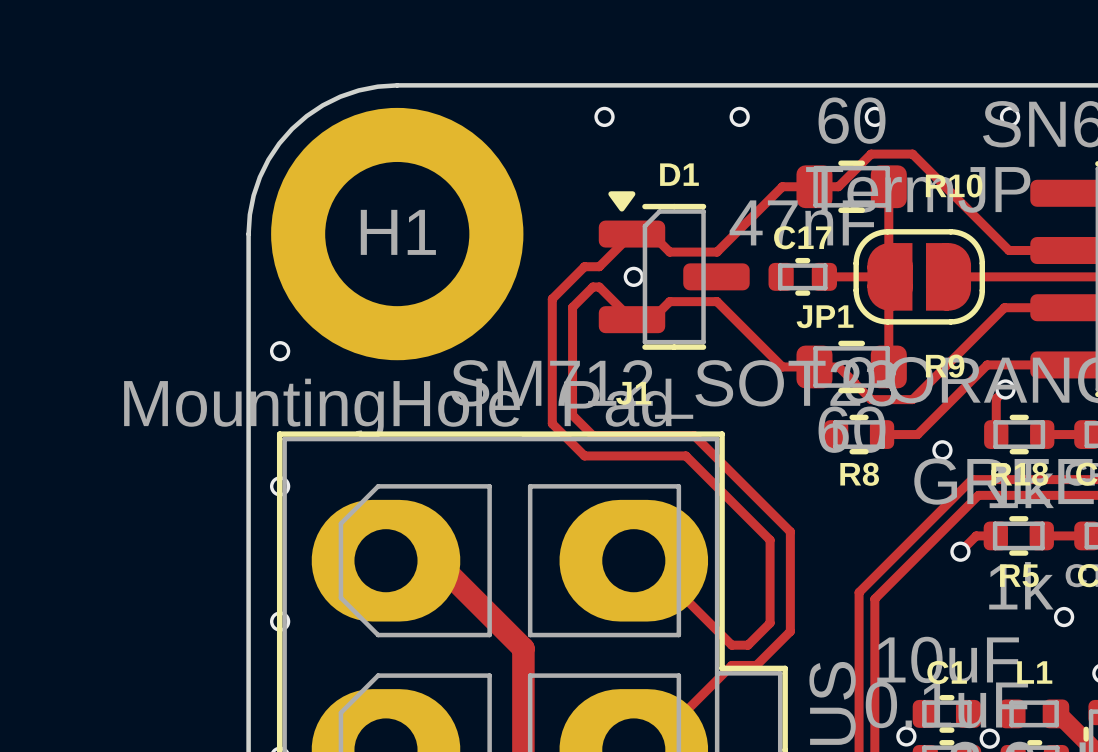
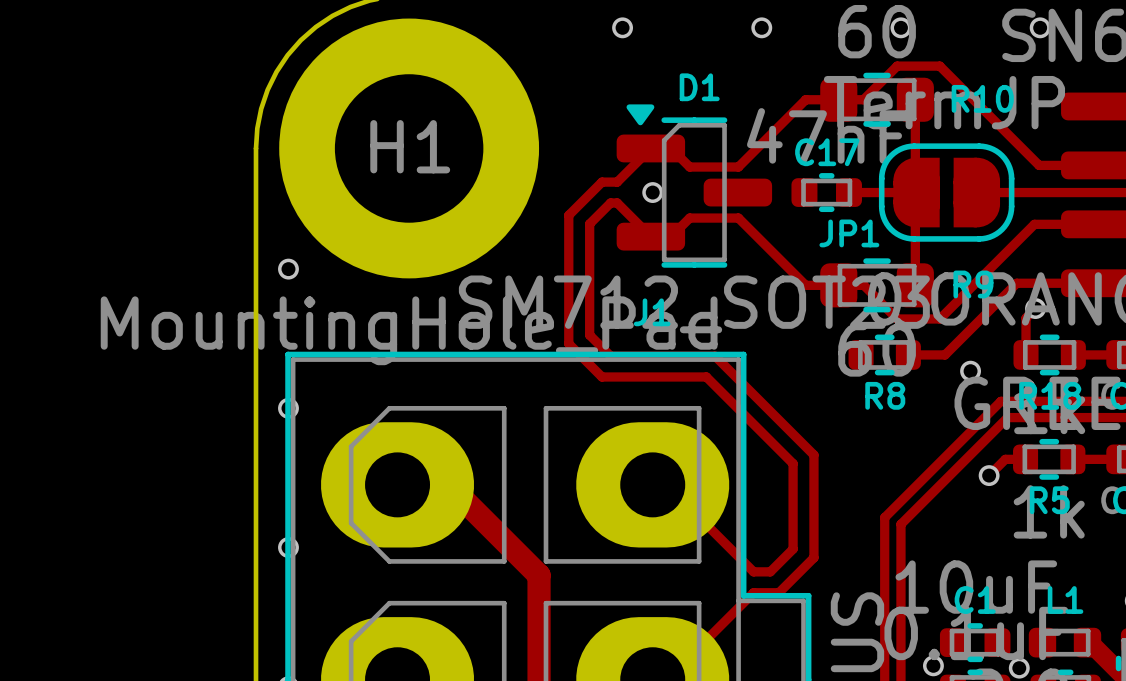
via: (1064, 617) -> none

